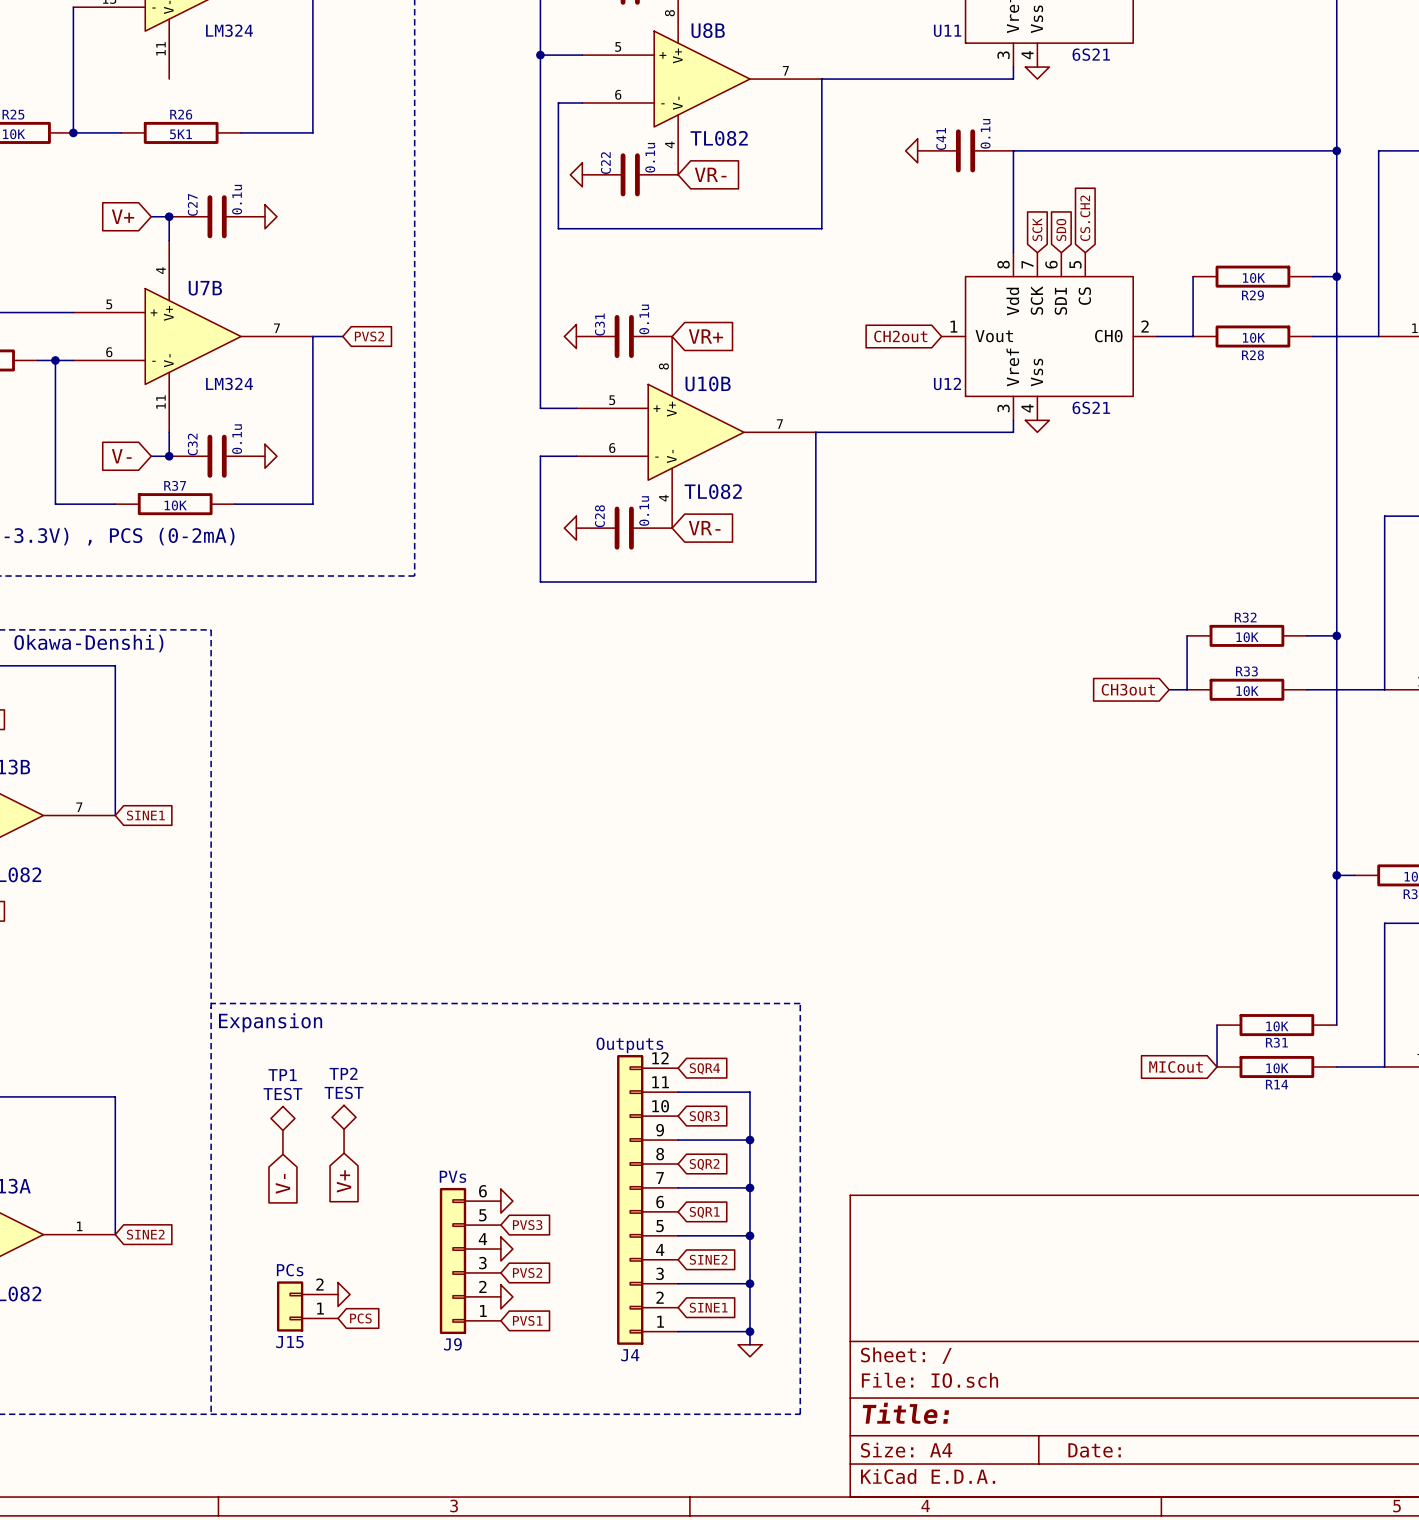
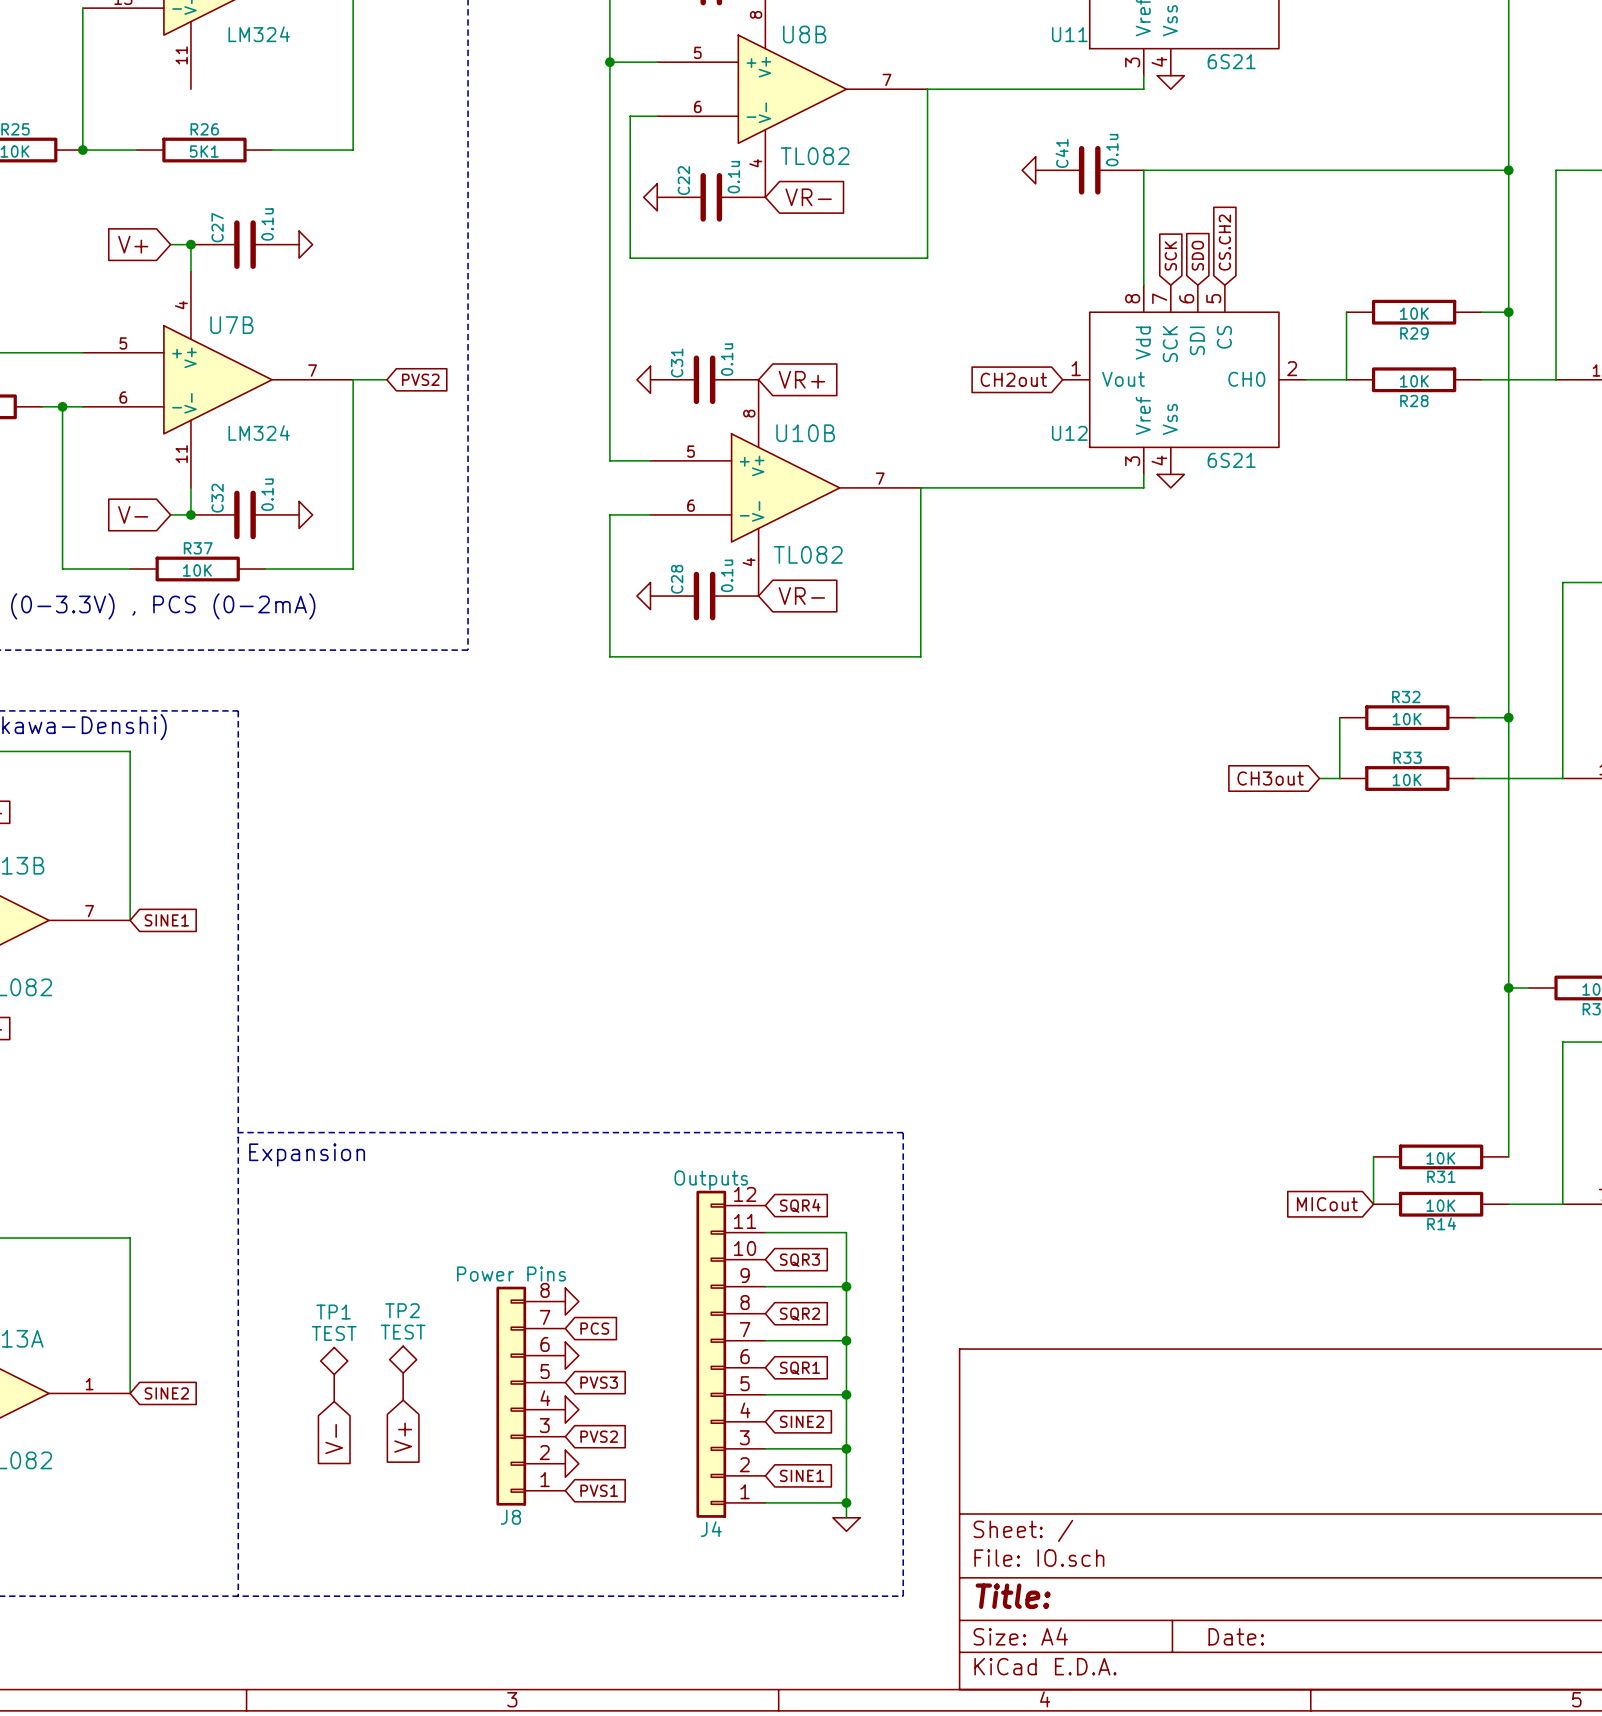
TP2 position: (344, 1129) -> (403, 1373)
TP1 position: (282, 1130) -> (334, 1374)
global label position: V+ (344, 1181) -> V+ (403, 1437)
global label position: V- (282, 1183) -> V- (334, 1439)
J8: none -> Power Pins (530, 1396)
J9: PVs (470, 1260) -> none
power symbol position: (344, 1294) -> (572, 1301)
J15: PCs (307, 1306) -> none
global label position: PCS (360, 1318) -> PCS (594, 1328)

